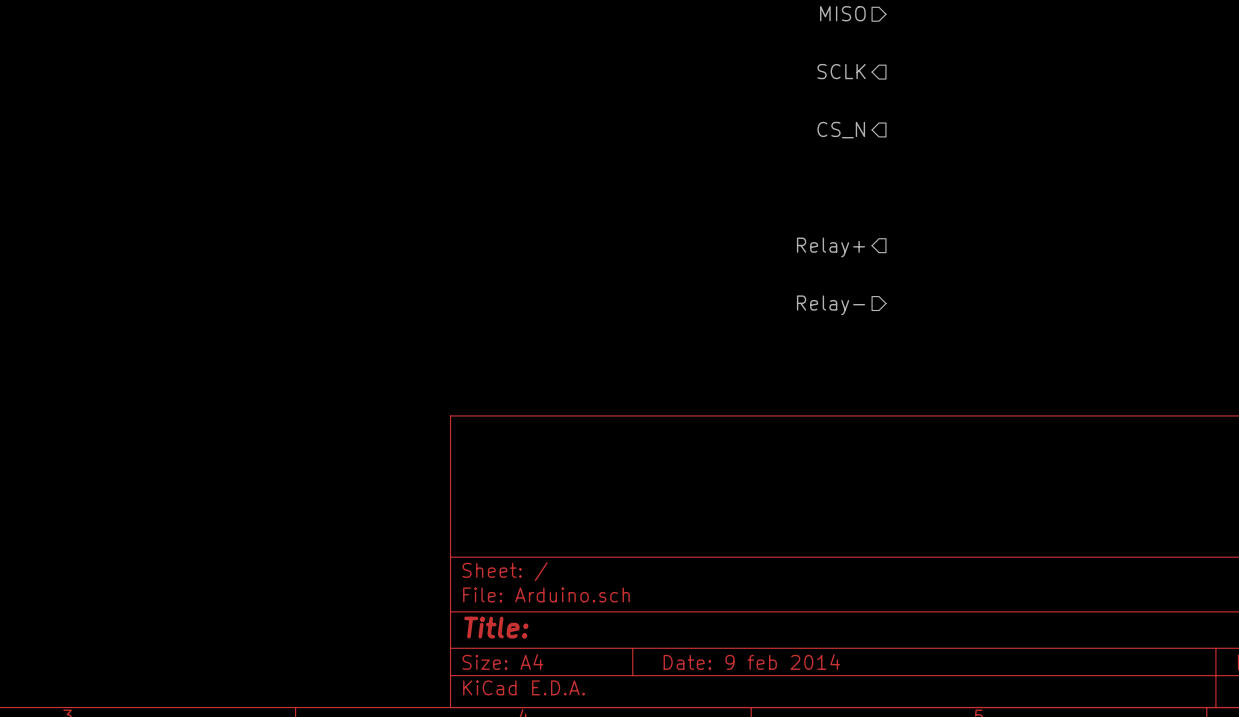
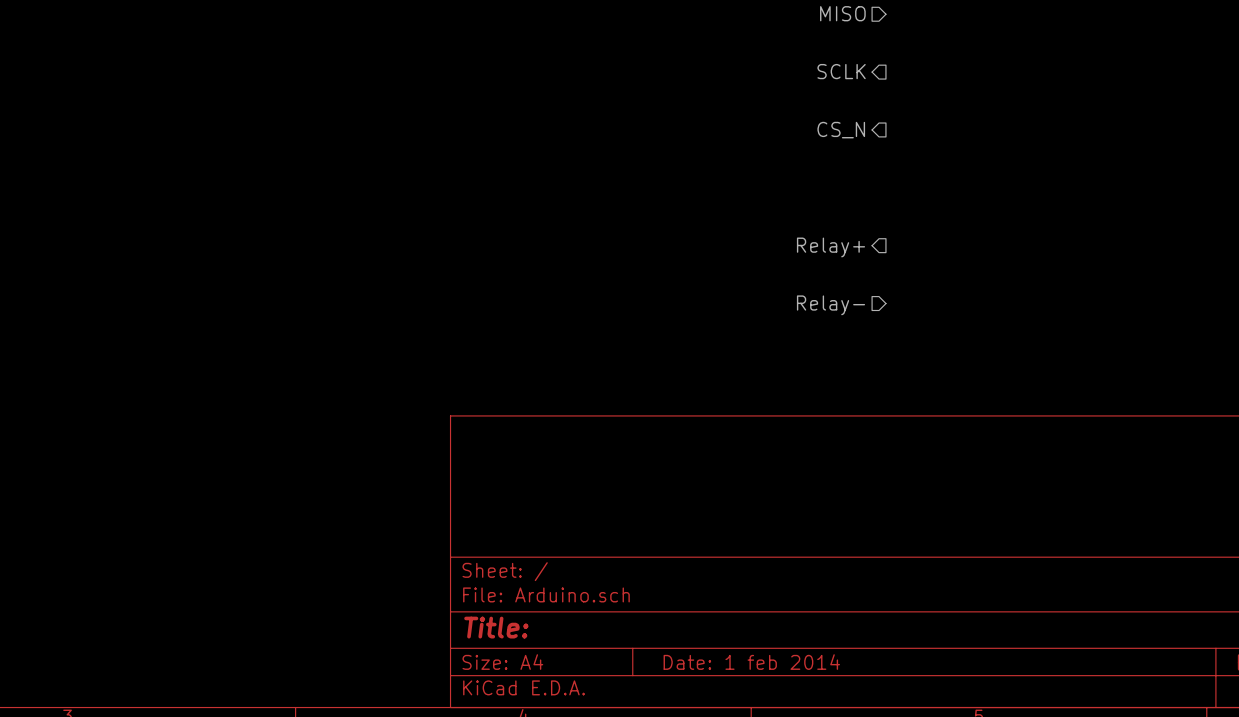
title block: Date: 9 feb 2014 (751, 662) -> Date: 1 feb 2014 (751, 662)

